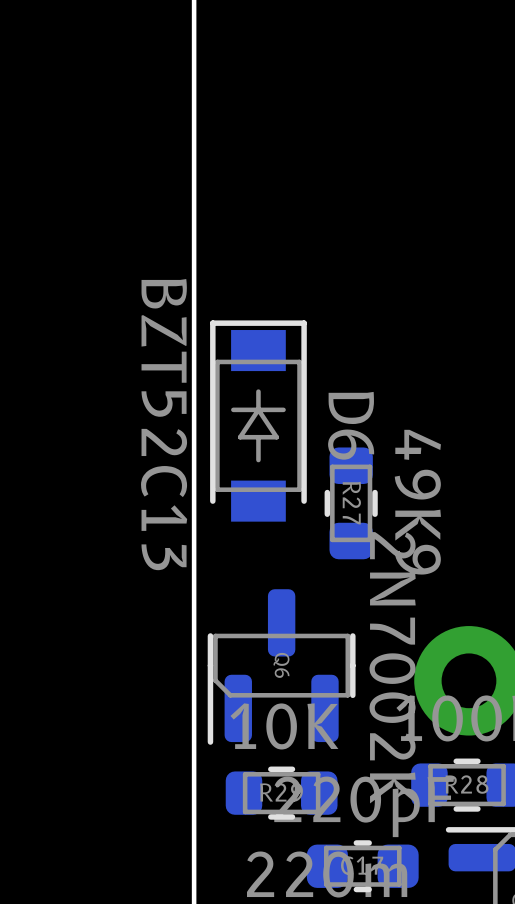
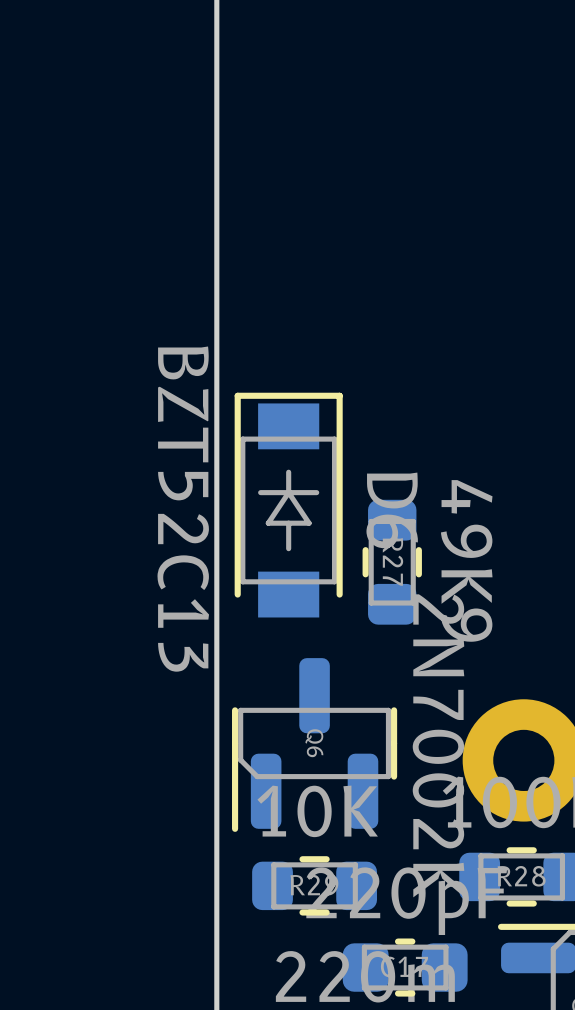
D6 position: (258, 421) -> (288, 505)

